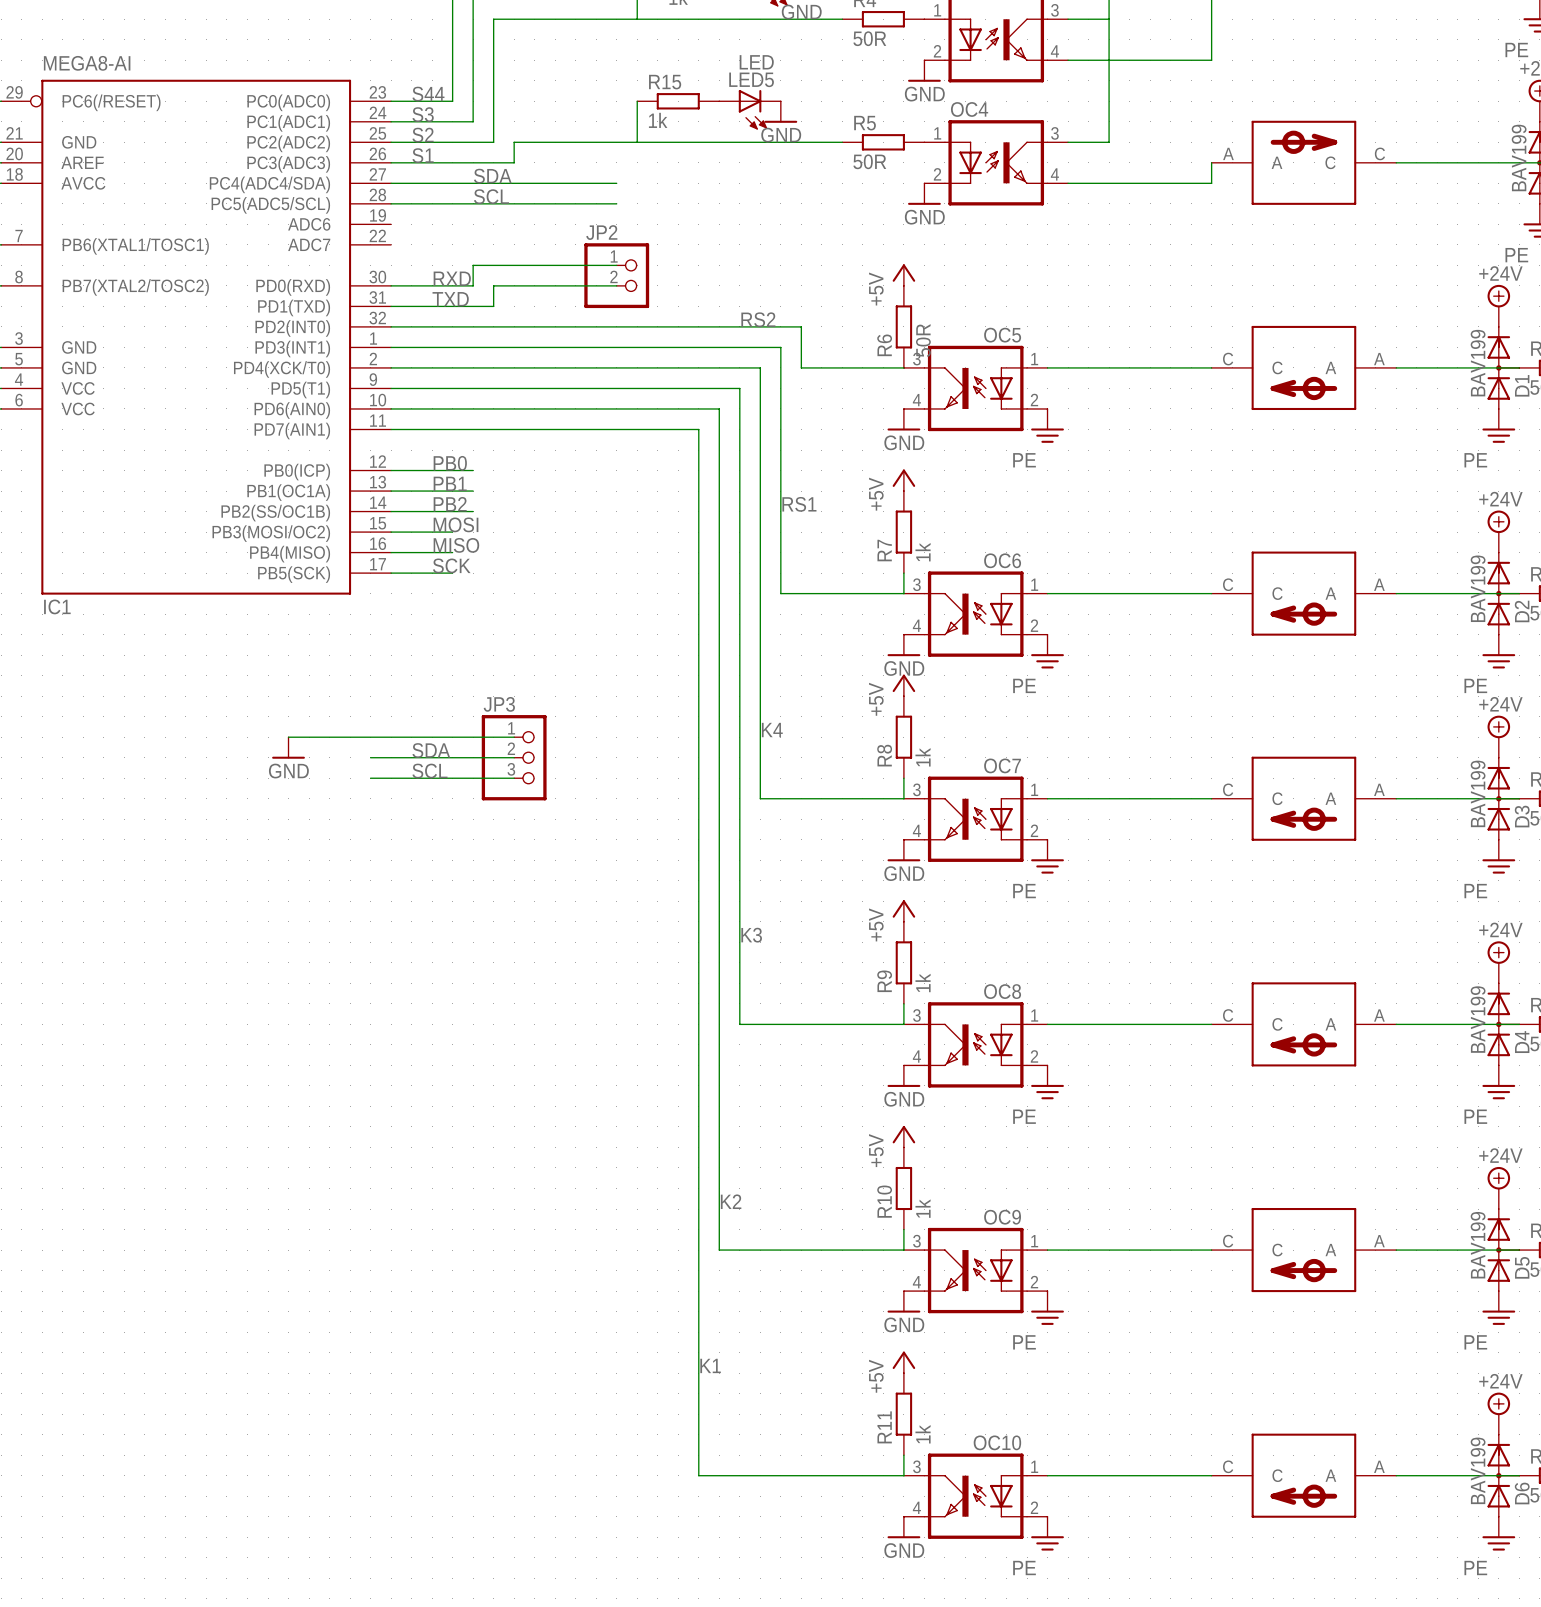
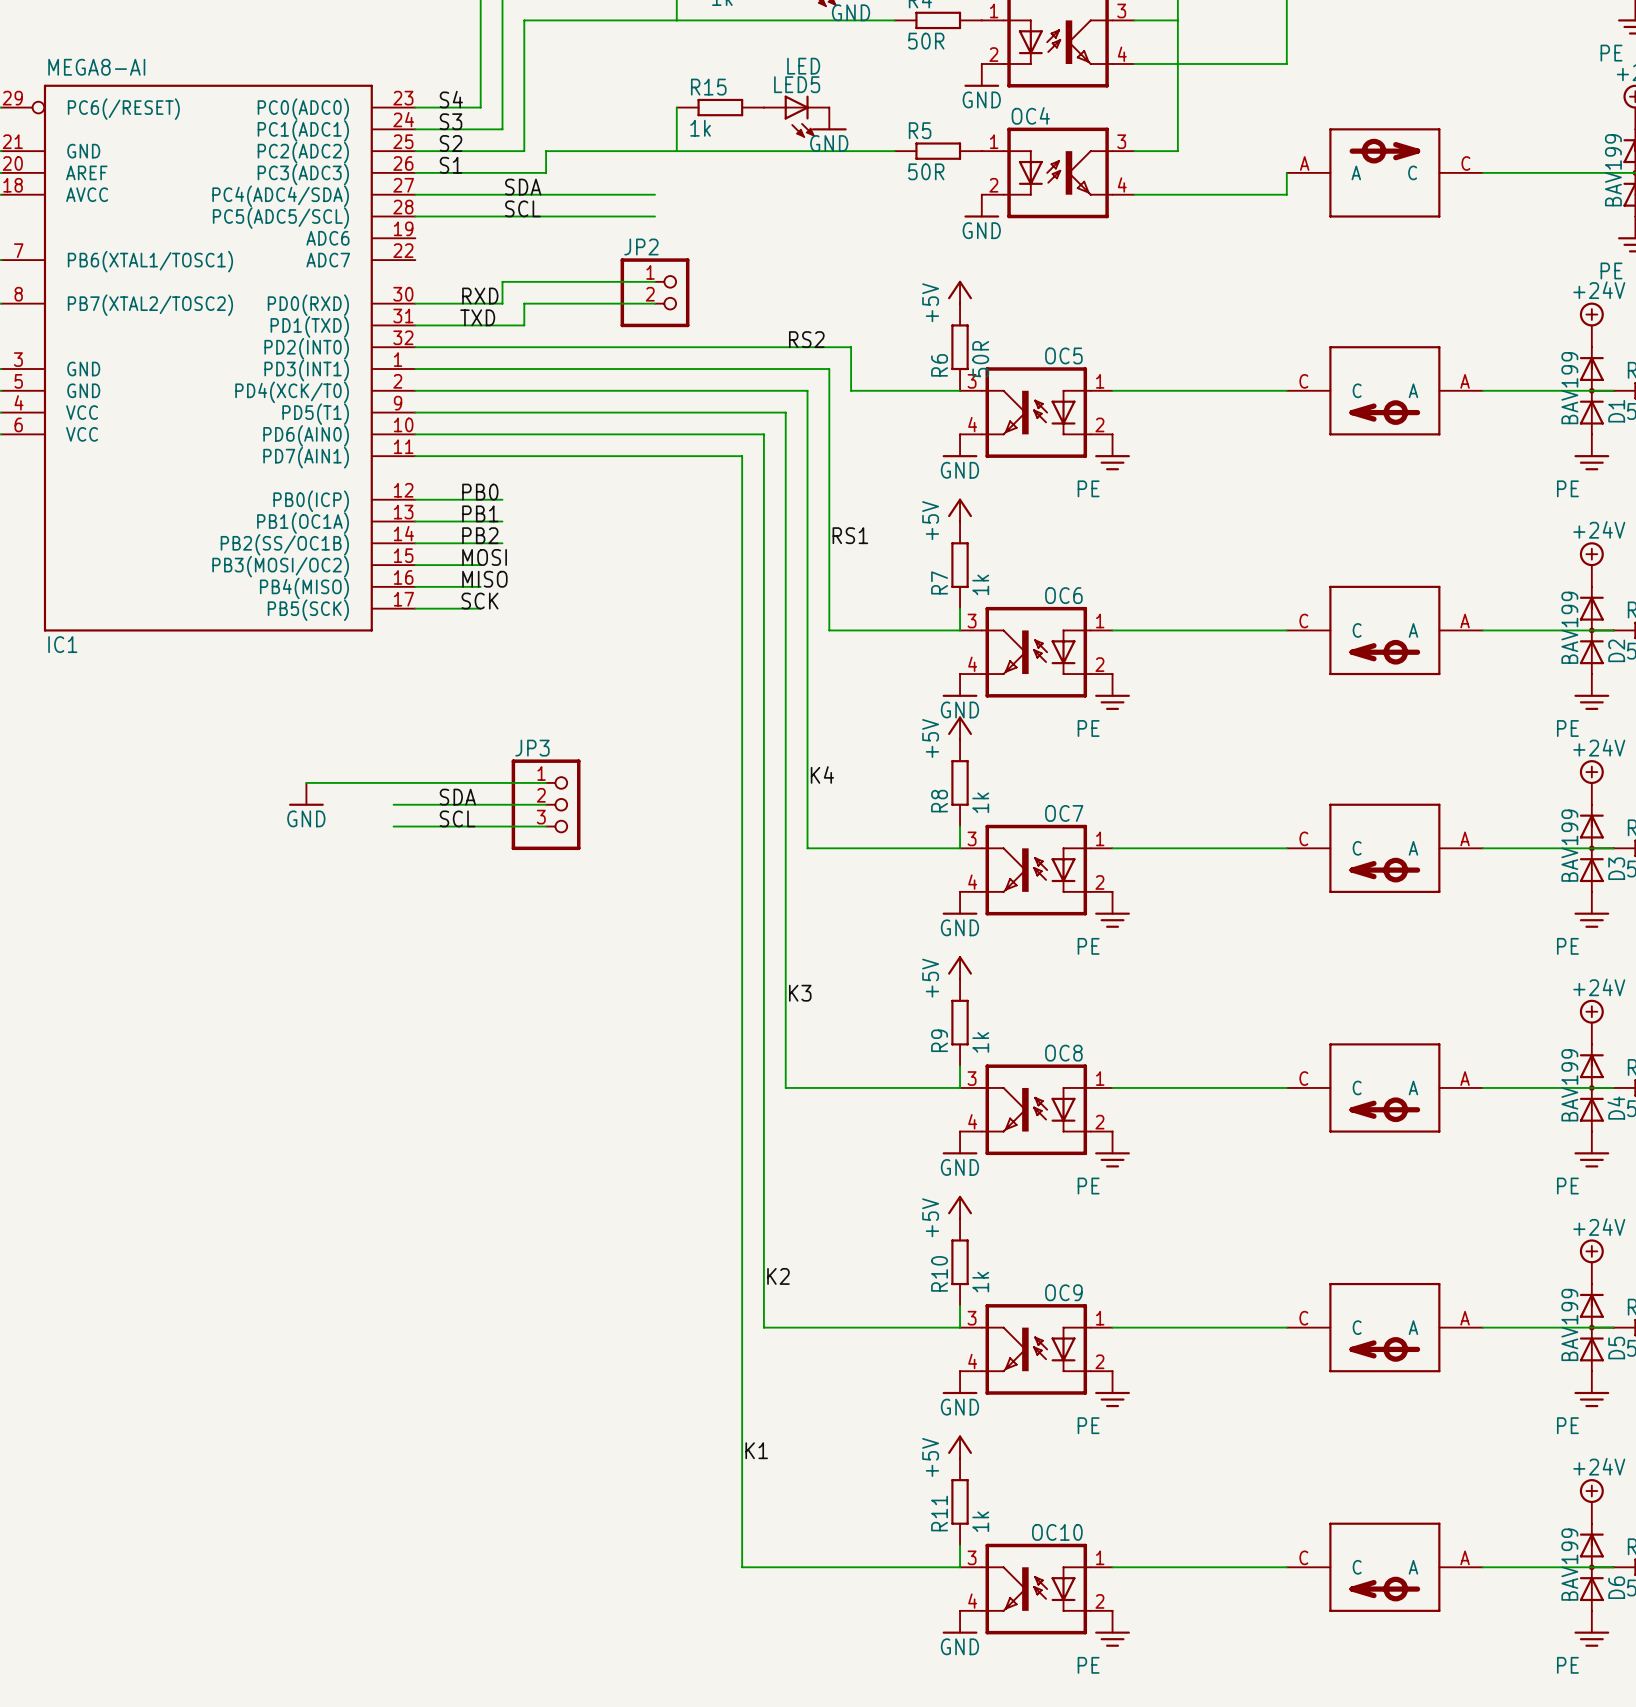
label: S44 (428, 94) -> S4 (451, 99)

